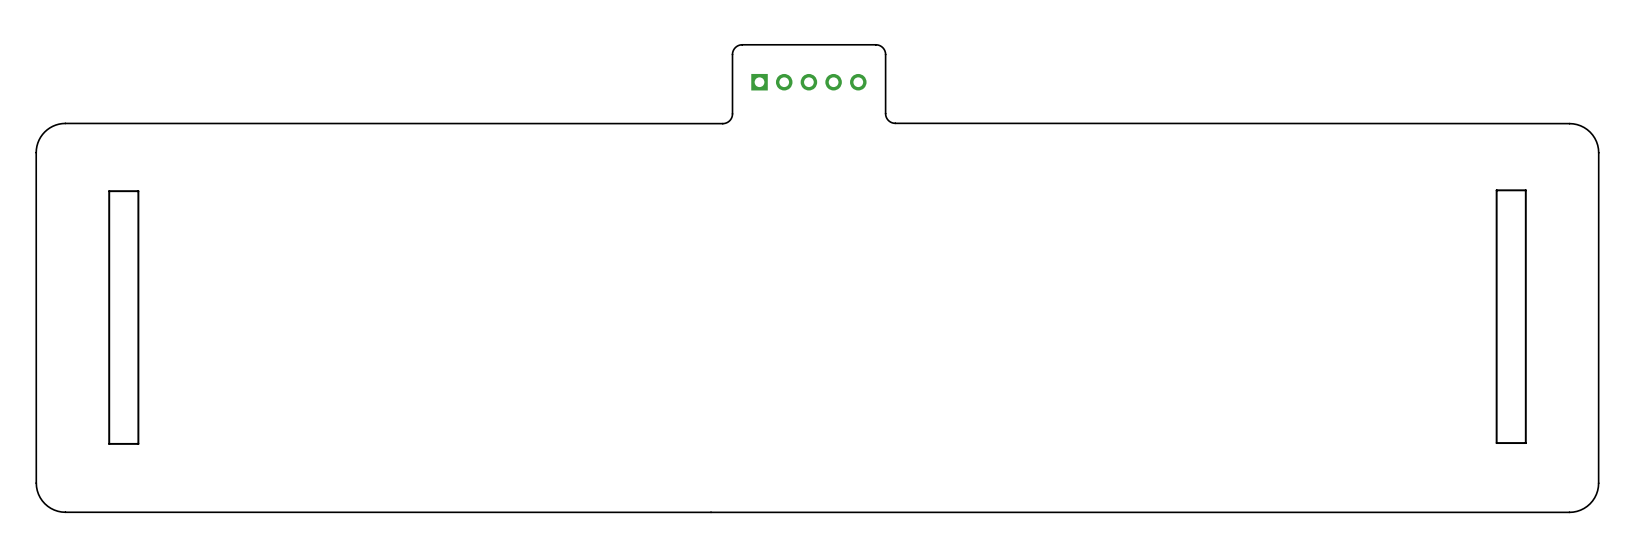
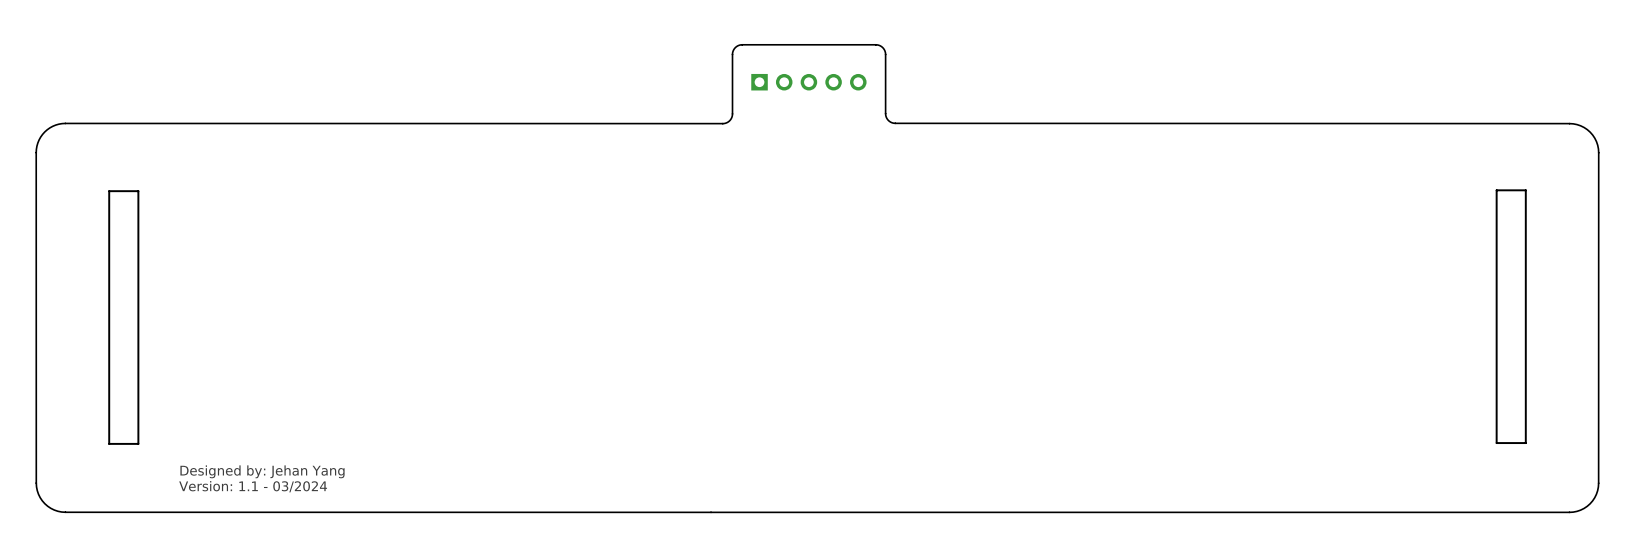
text: none -> Designed by: Jehan Yang (262, 471)
text: none -> Version: 1.1 - 03/2024 (253, 486)

